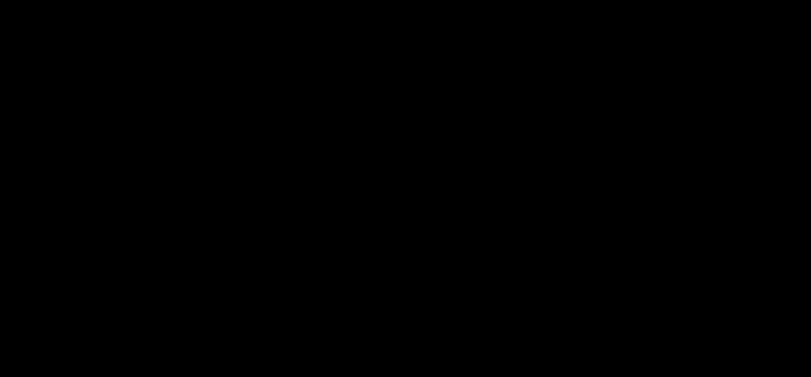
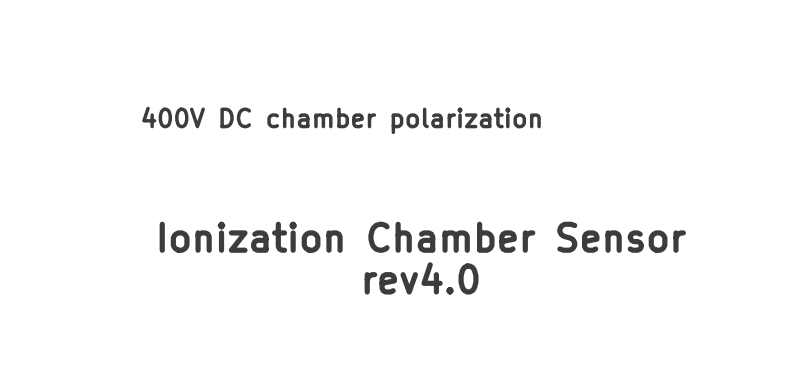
text: none -> 400V DC chamber polarization (341, 120)
text: none -> Ionization Chamber Sensor (422, 237)
text: none -> rev4.0 (421, 278)

